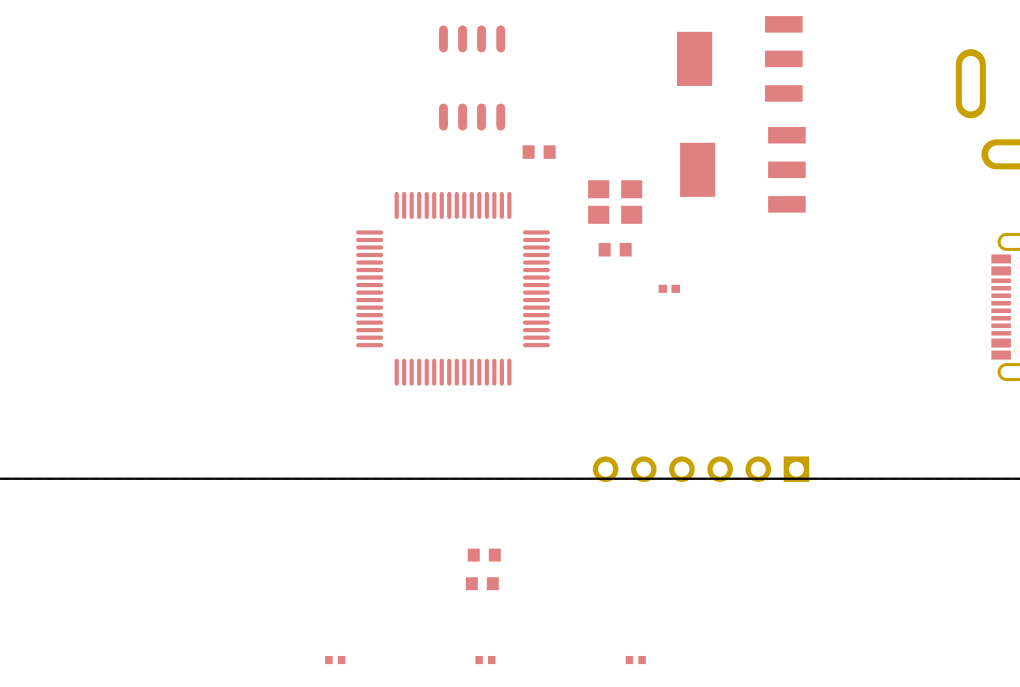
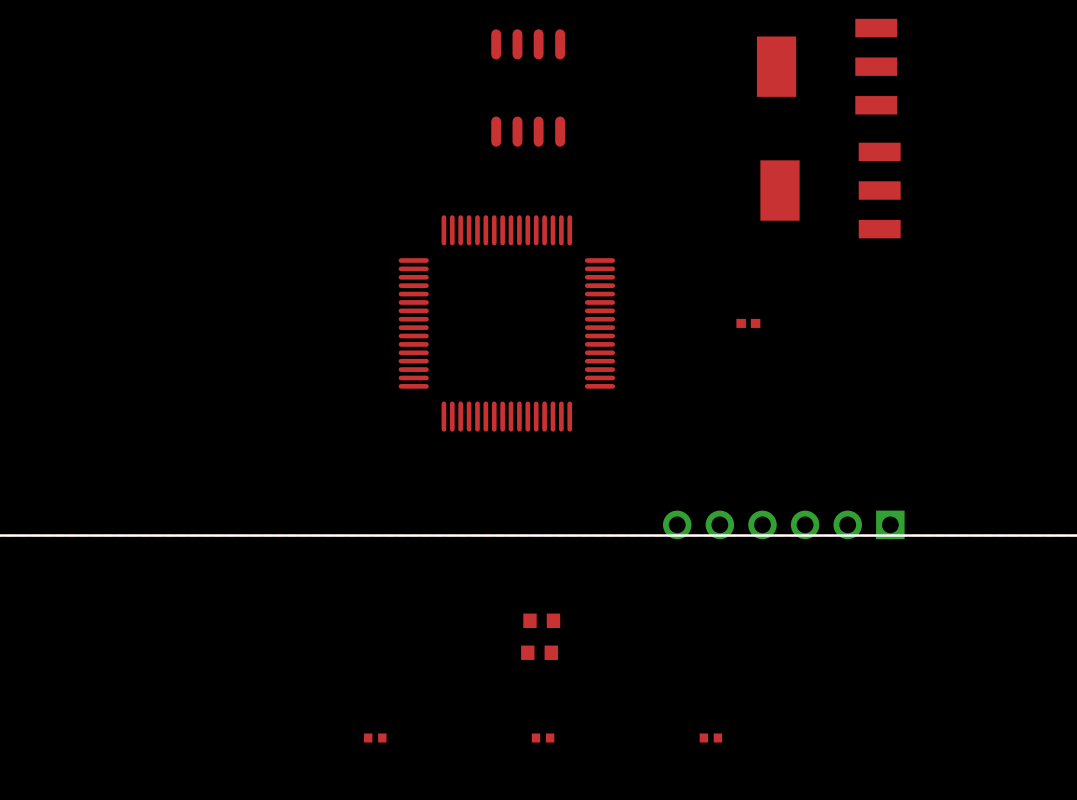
part: (539, 152) -> none
part: (615, 202) -> none
part: (615, 249) -> none

